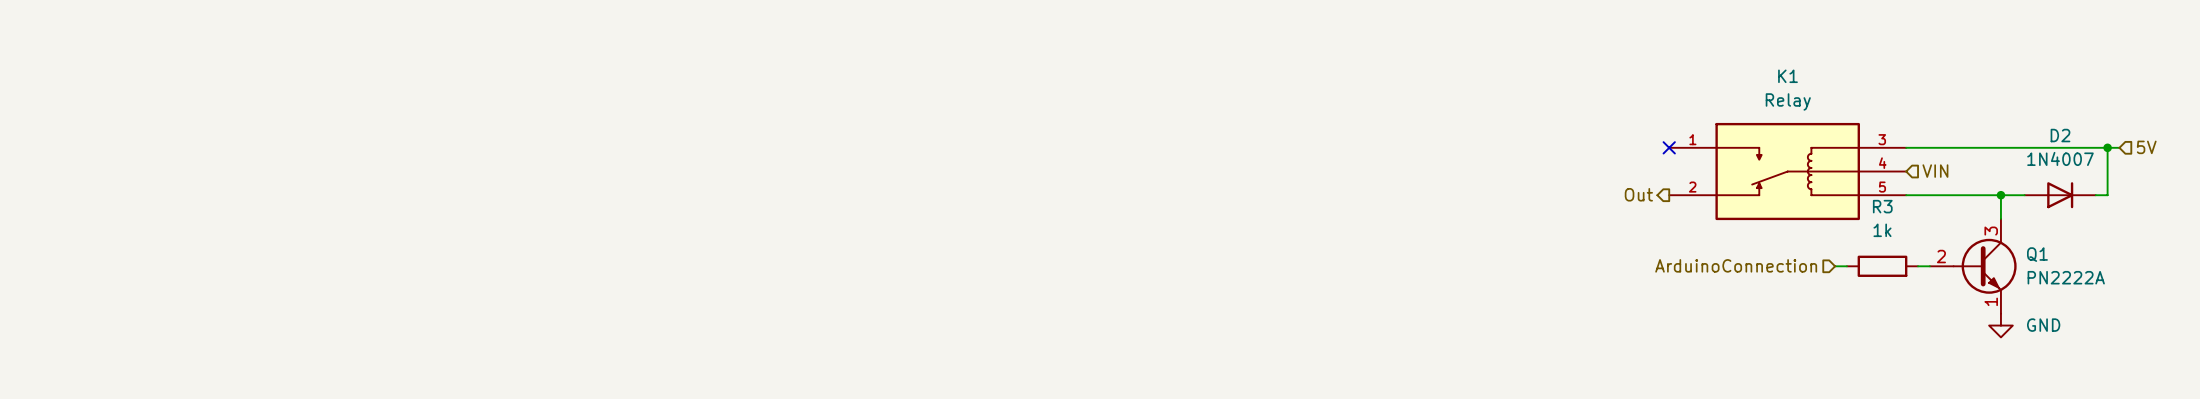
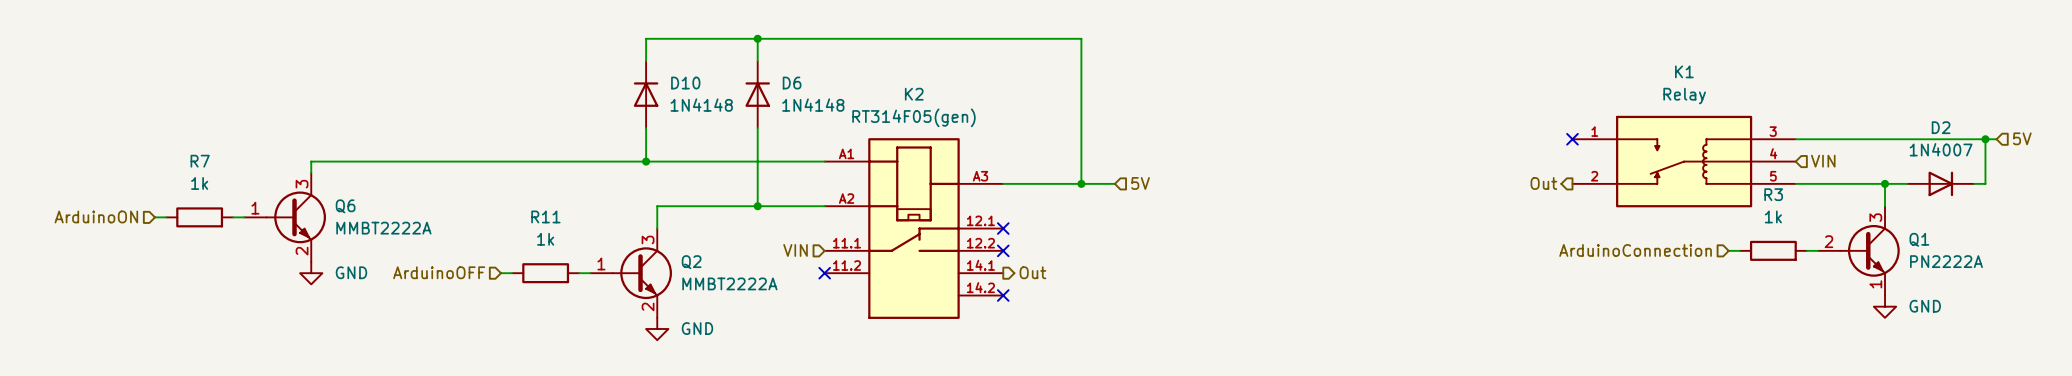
wire: none -> (757, 38) (757, 61)
junction: none -> (757, 38)
wire: none -> (646, 61) (646, 38) (1081, 38) (1081, 183)
D10: none -> 1N4148 (646, 94)
D6: none -> 1N4148 (757, 94)
wire: none -> (646, 128) (646, 161)
wire: none -> (757, 128) (757, 206)
junction: none -> (646, 161)
wire: none -> (824, 161) (311, 161) (311, 172)
hierarchical label: none -> 5V (1140, 183)
wire: none -> (1003, 183) (1114, 183)
junction: none -> (1081, 183)
junction: none -> (757, 206)
wire: none -> (824, 206) (657, 206) (657, 228)
hierarchical label: none -> ArduinoON (96, 216)
wire: none -> (154, 217) (166, 217)
R7: none -> 1k (199, 217)
wire: none -> (233, 217) (244, 217)
Q6: none -> MMBT2222A (285, 217)
K2: none -> RT314F05(gen) (913, 228)
no-connect mark: none -> (1003, 228)
hierarchical label: none -> VIN (795, 250)
no-connect mark: none -> (1003, 250)
hierarchical label: none -> ArduinoOFF (439, 272)
hierarchical label: none -> Out (1032, 272)
power symbol: none -> GND (311, 273)
wire: none -> (500, 273) (512, 273)
R11: none -> 1k (545, 273)
wire: none -> (579, 273) (590, 273)
Q2: none -> MMBT2222A (631, 273)
no-connect mark: none -> (824, 273)
no-connect mark: none -> (1003, 295)
power symbol: none -> GND (657, 329)

